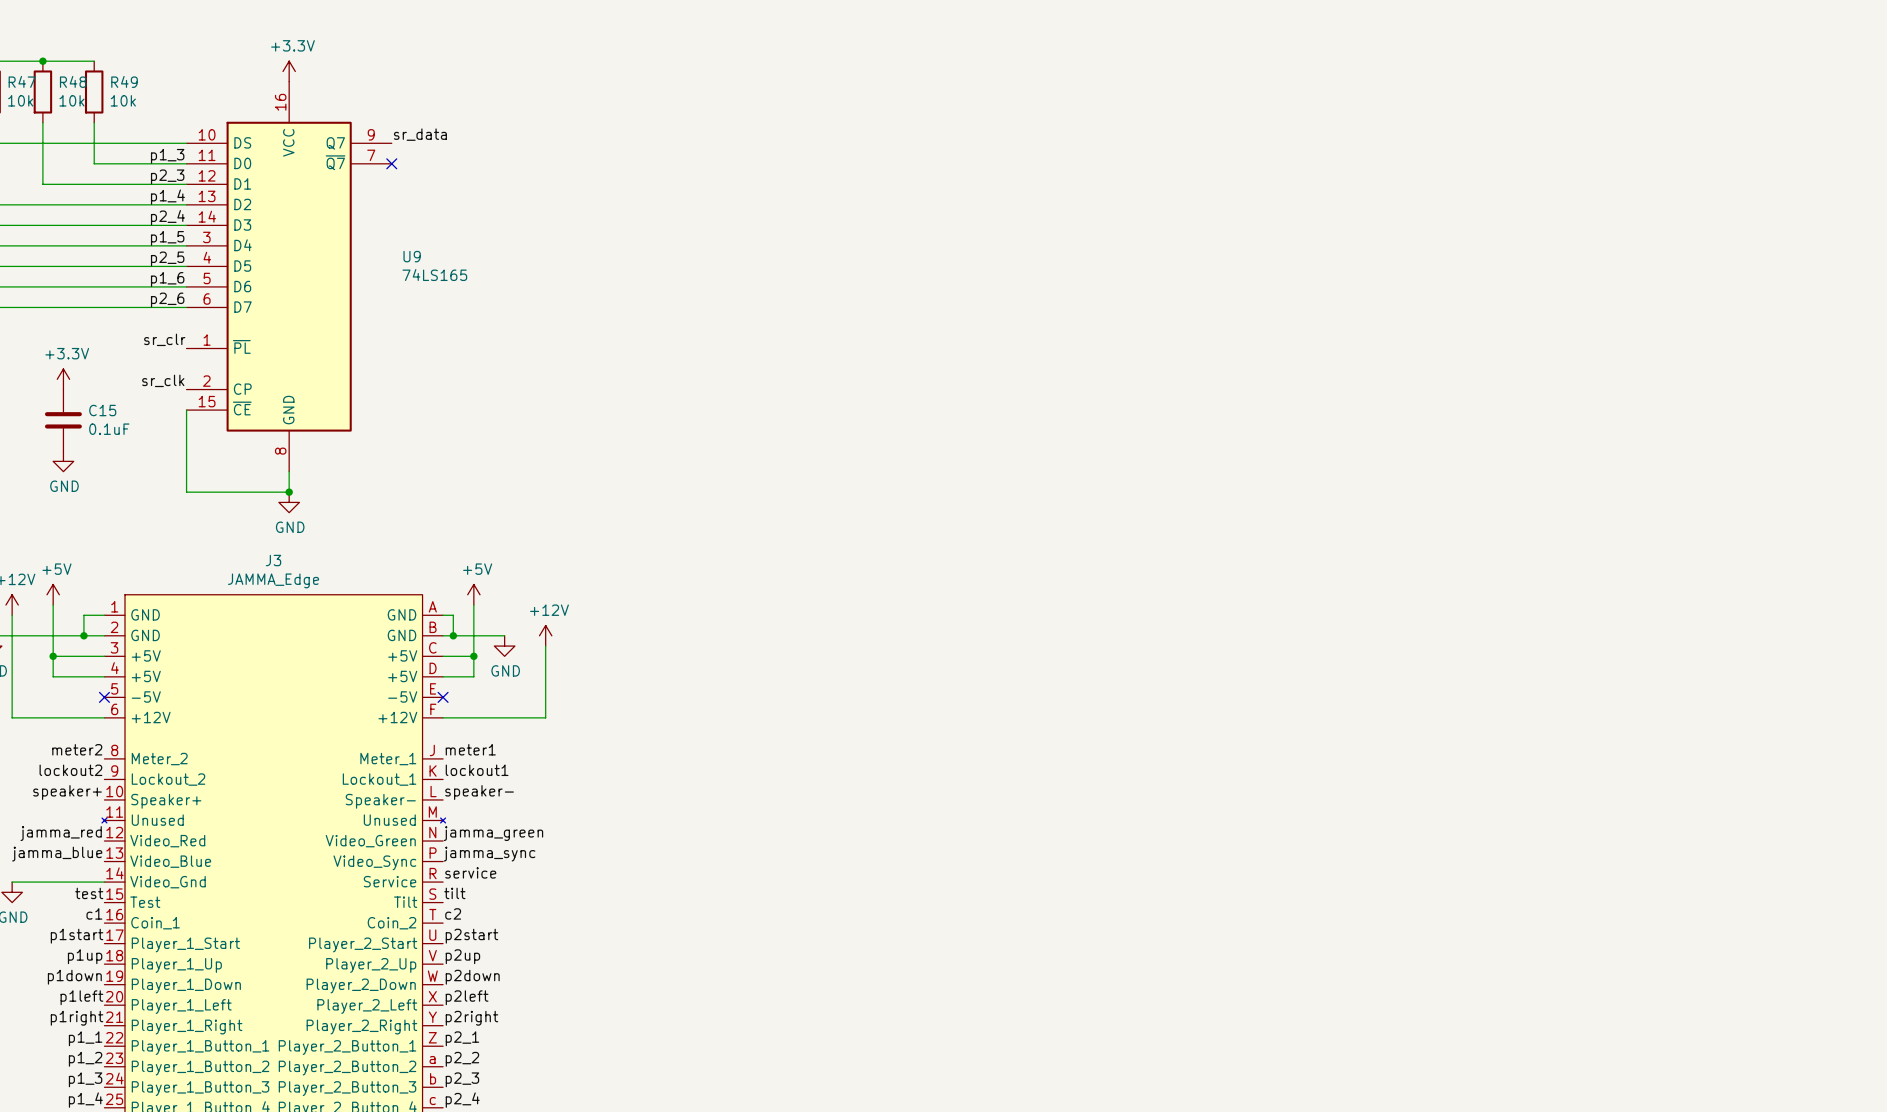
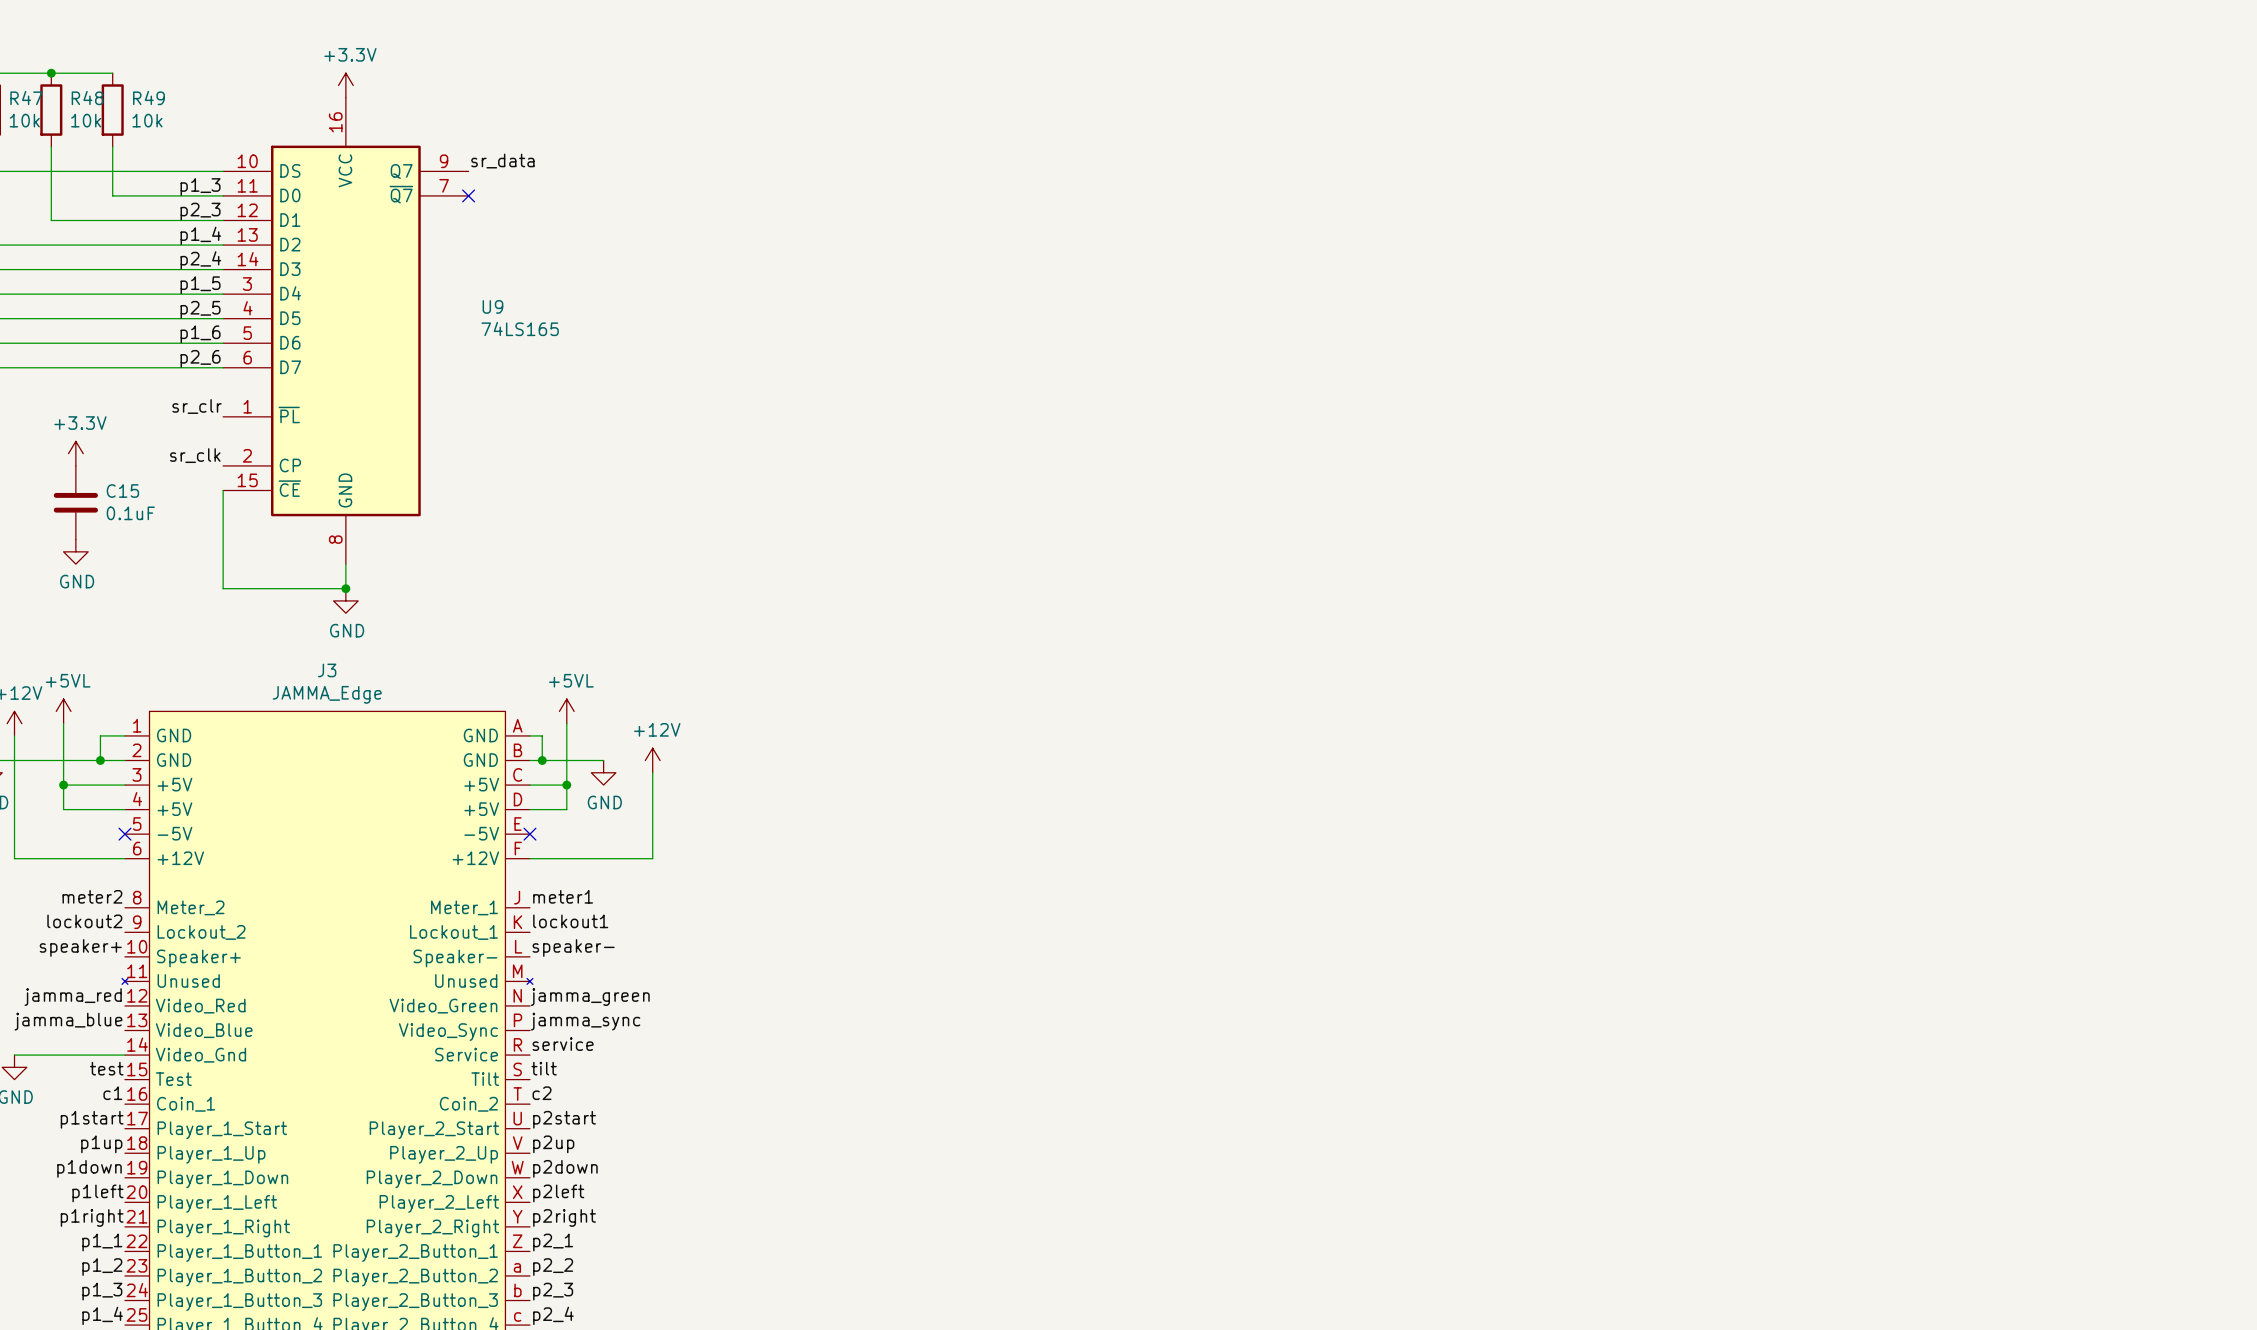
power symbol: +5V (53, 594) -> +5VL (63, 711)
power symbol: +5V (473, 594) -> +5VL (566, 711)

